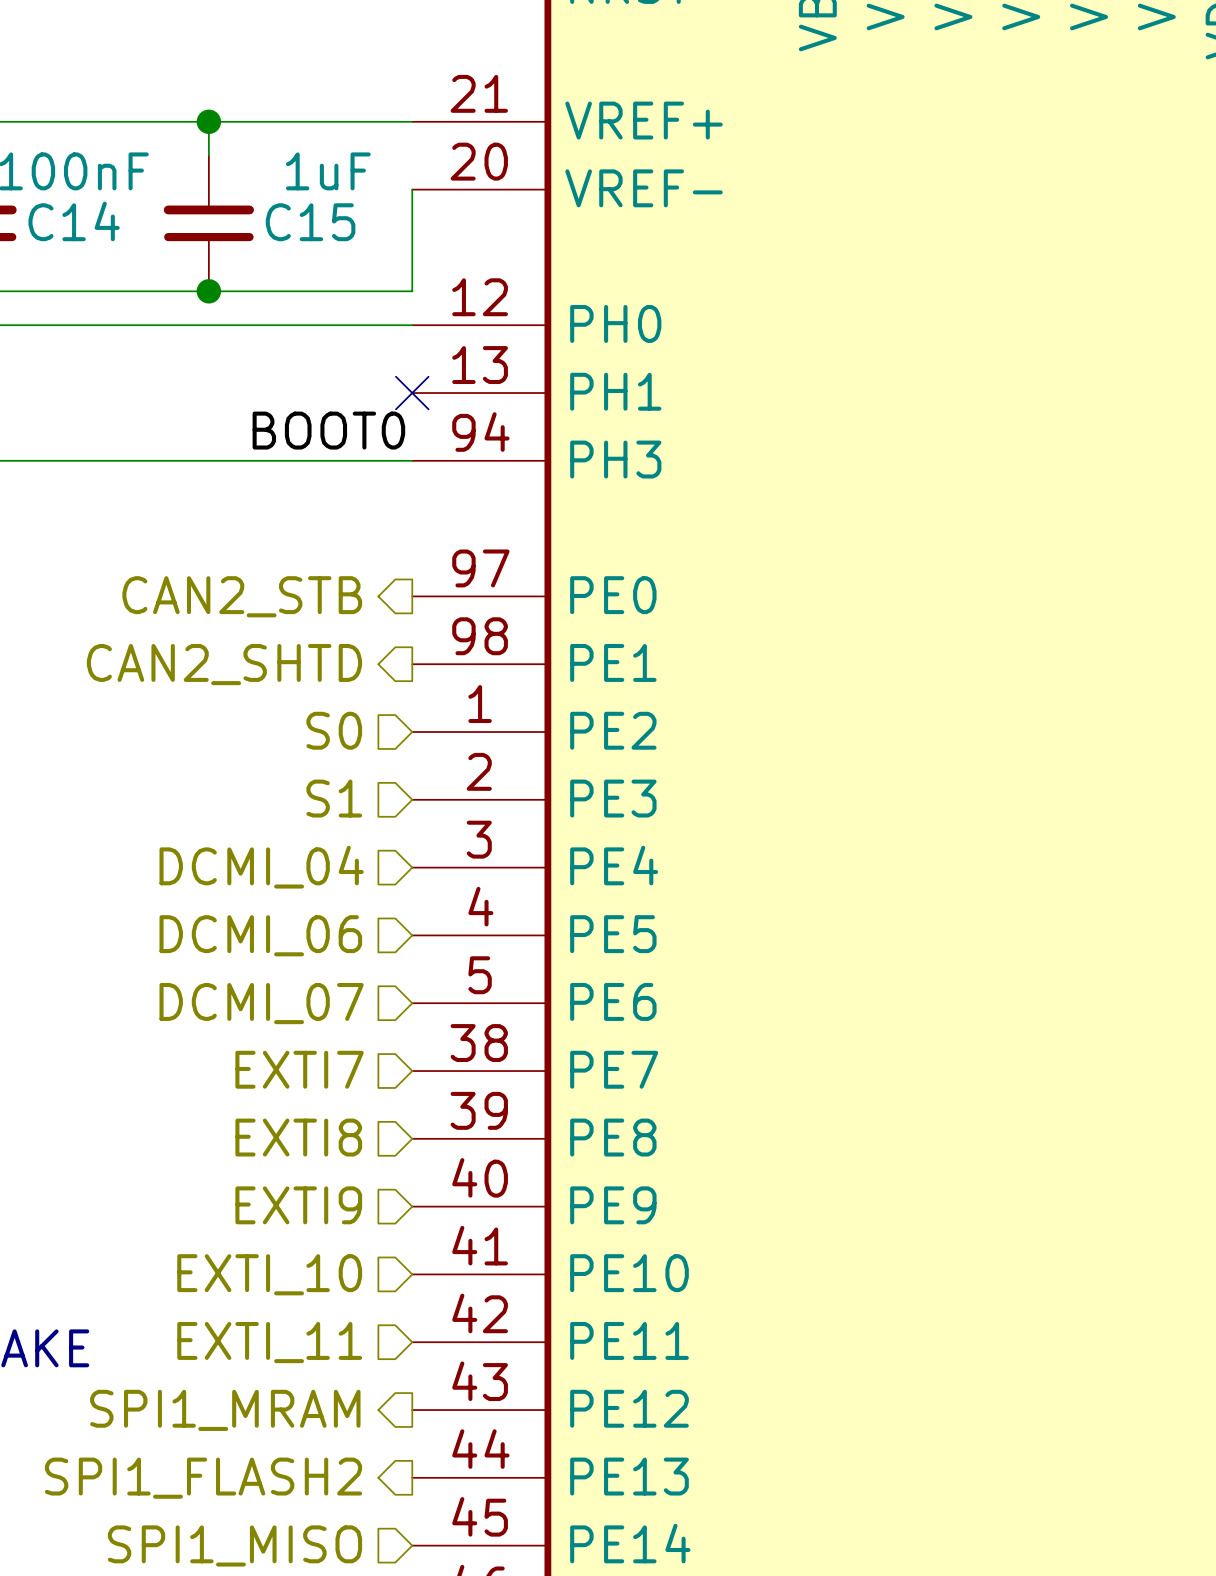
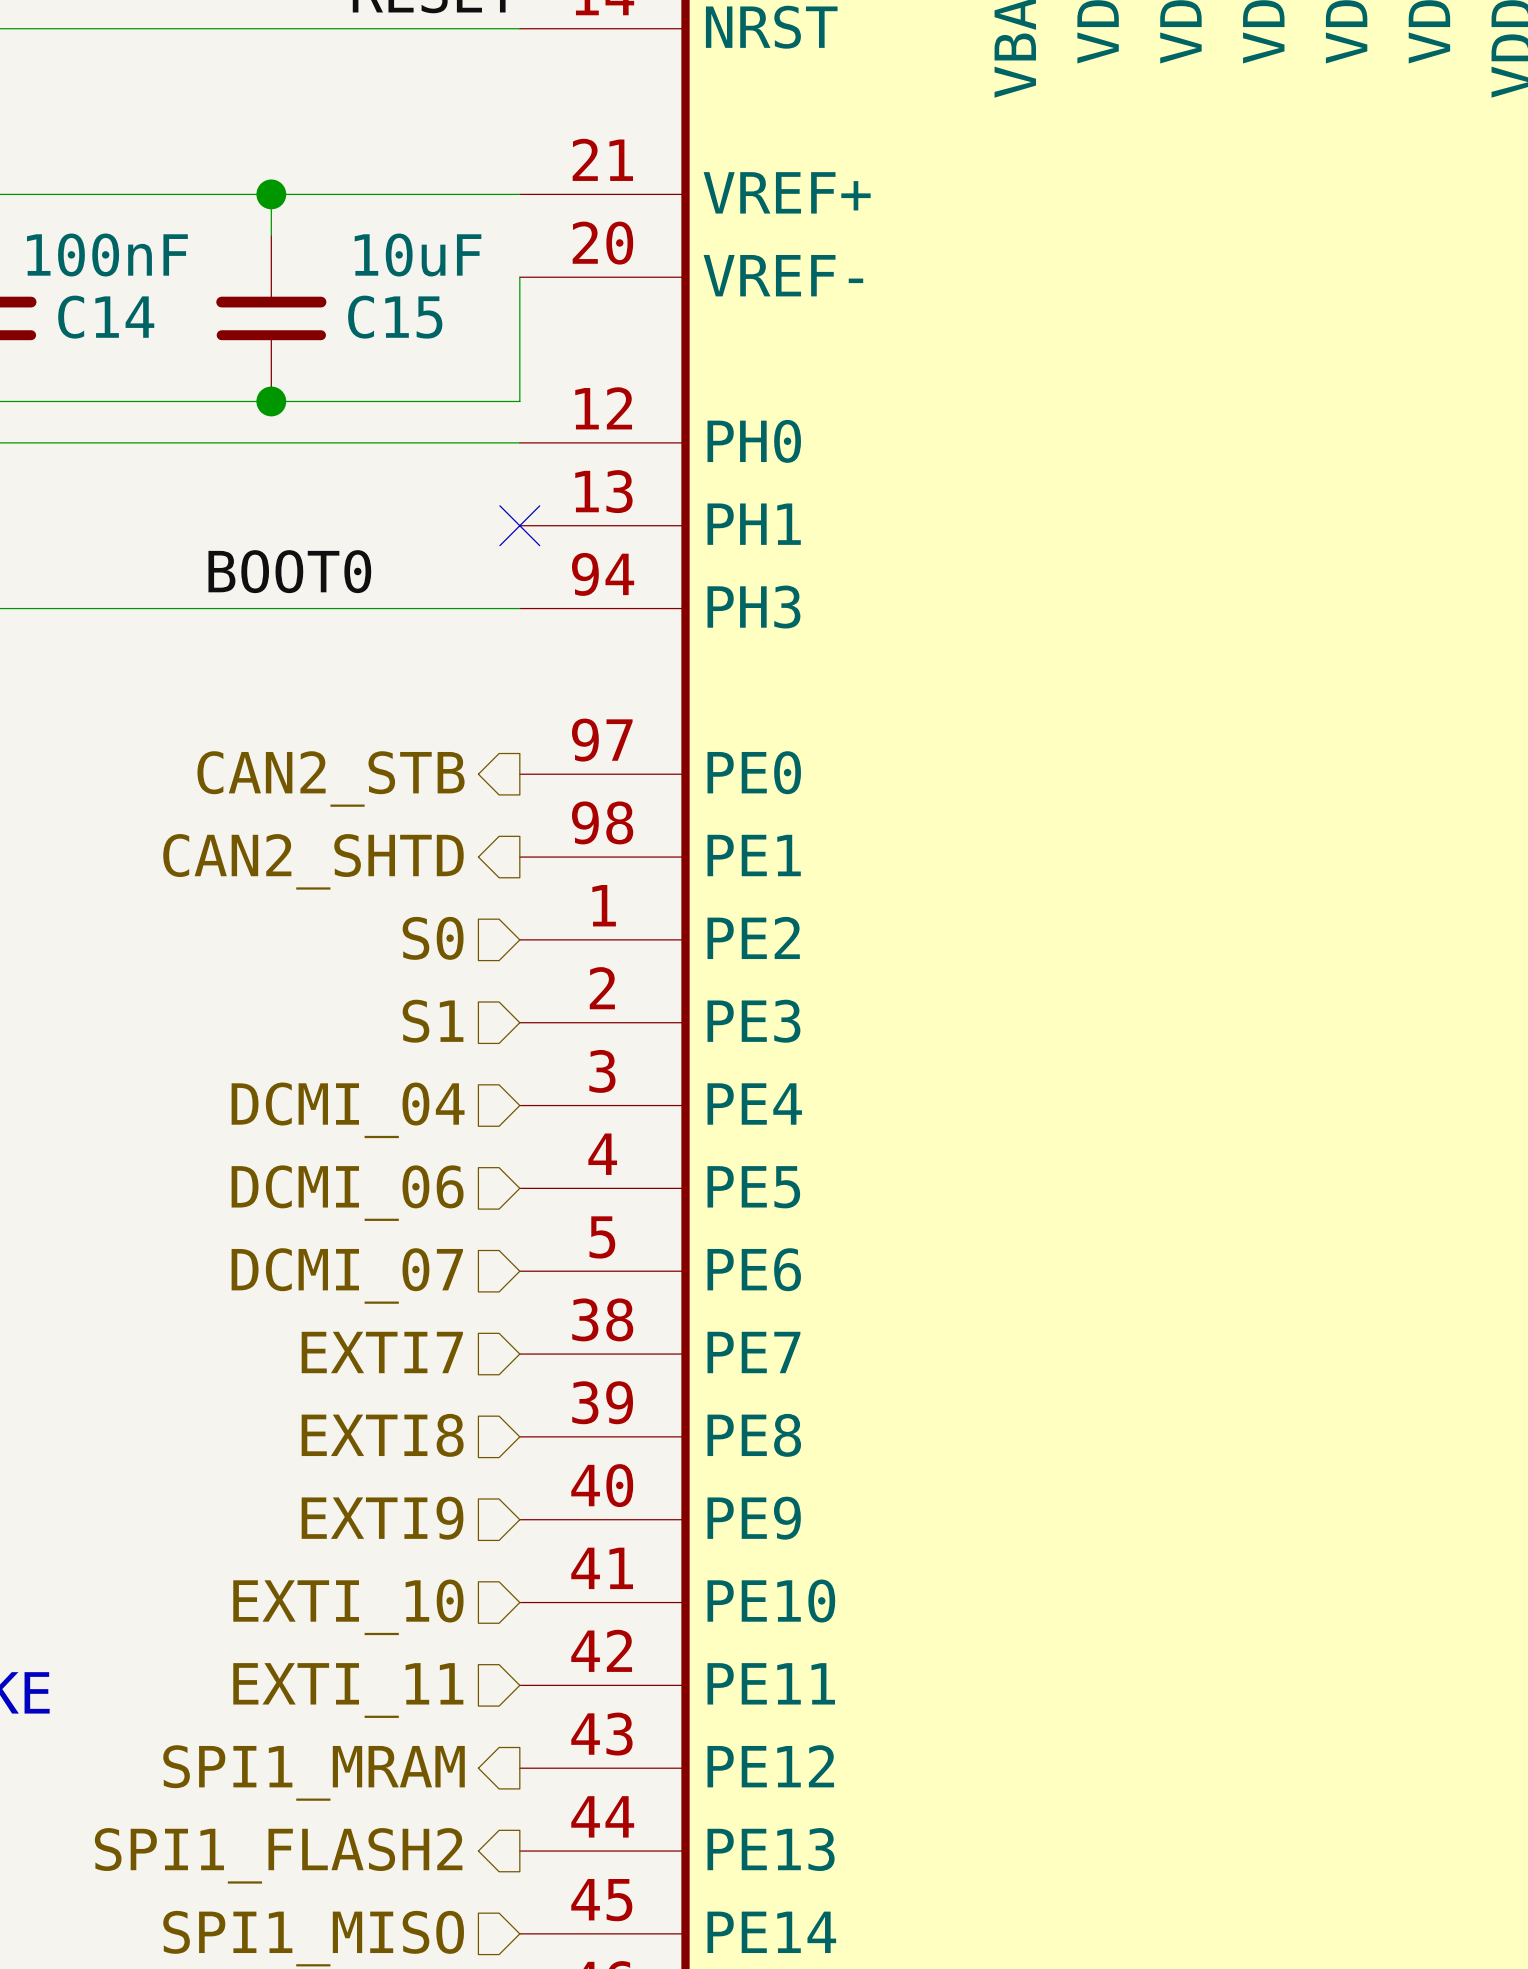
C15 value: 1uF (328, 171) -> 10uF (418, 255)
label position: BOOT0 (328, 430) -> BOOT0 (289, 571)

